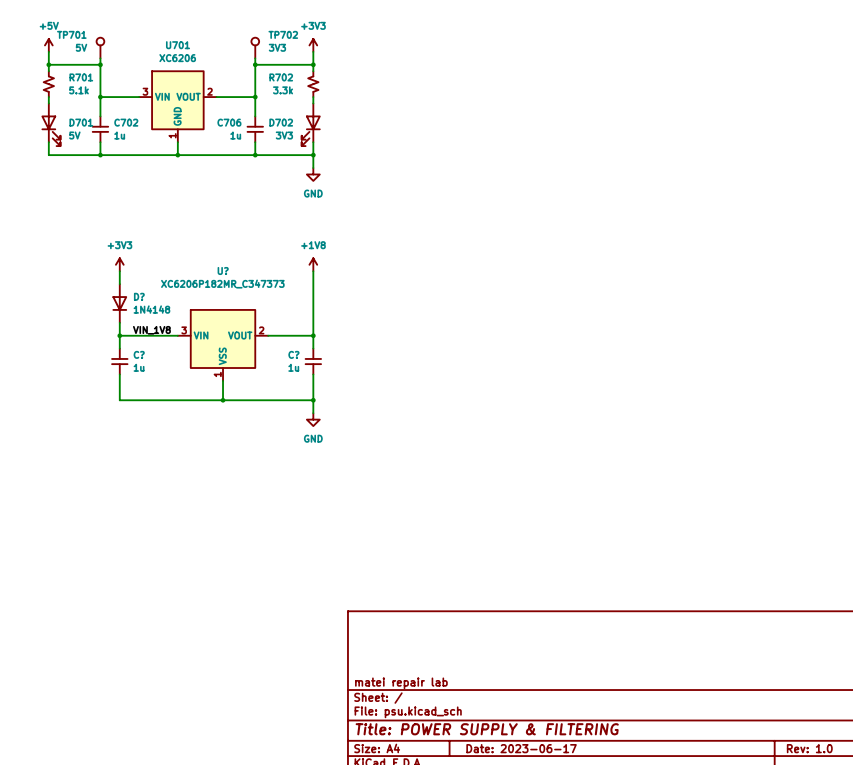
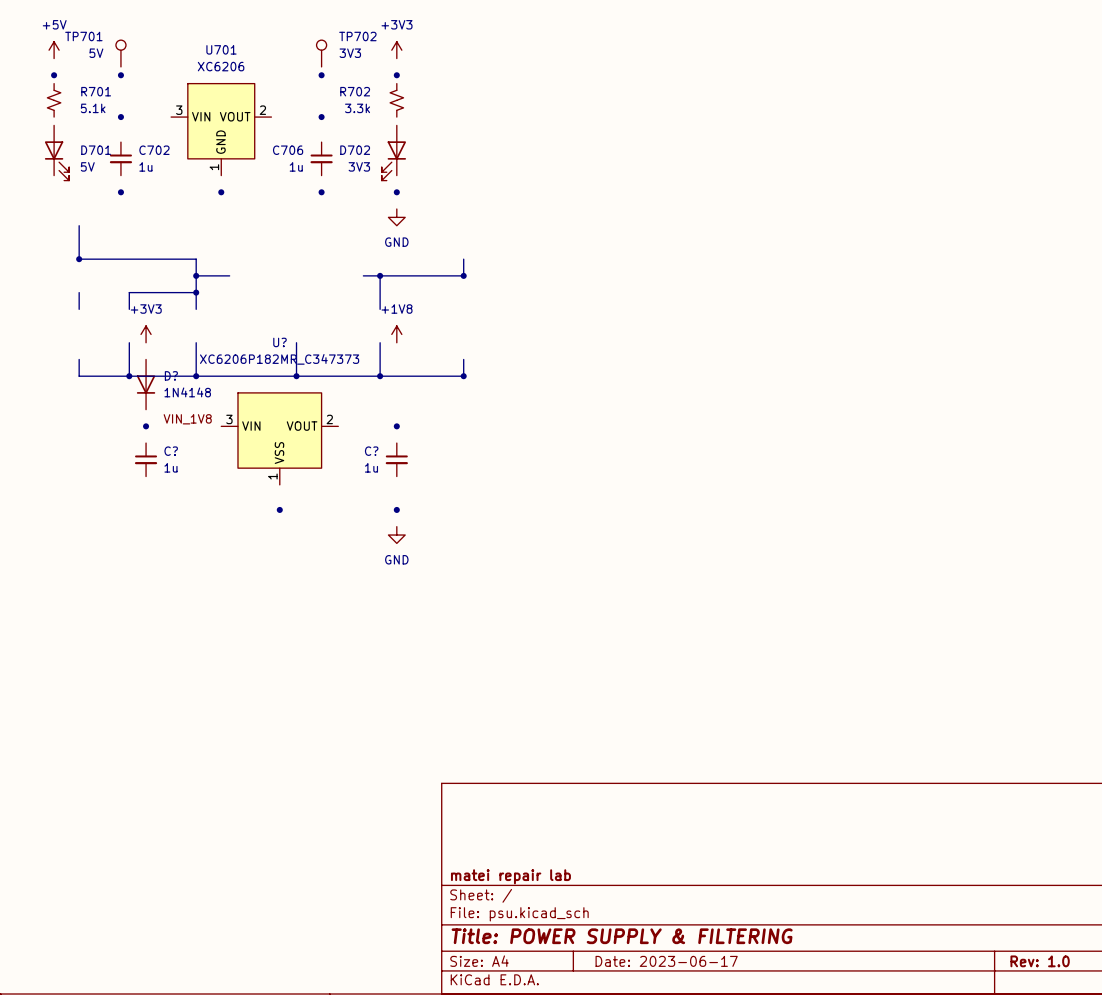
wire: (48, 51) (48, 71) -> none
wire: (313, 51) (313, 71) -> none
wire: (100, 58) (100, 116) -> none
wire: (255, 58) (255, 116) -> none
wire: (48, 64) (100, 64) -> none
wire: (255, 64) (313, 64) -> none
wire: (48, 97) (48, 103) -> none
wire: (100, 97) (139, 97) -> none
wire: (216, 97) (255, 97) -> none
wire: (313, 97) (313, 103) -> none
wire: (48, 142) (48, 155) (313, 155) -> none
wire: (100, 142) (100, 155) -> none
wire: (177, 142) (177, 155) -> none
wire: (255, 142) (255, 155) -> none
wire: (313, 142) (313, 168) -> (380, 275) (380, 309)
wire: none -> (79, 225) (79, 259) (196, 259) (196, 309)
junction: none -> (79, 259)
wire: none -> (463, 259) (463, 275) (363, 275)
wire: none -> (196, 275) (229, 275)
junction: none -> (196, 275)
junction: none -> (380, 275)
junction: none -> (463, 275)
wire: none -> (196, 292) (129, 292) (129, 309)
junction: none -> (196, 292)
wire: (119, 271) (119, 284) -> (79, 292) (79, 309)
wire: none -> (196, 342) (196, 376)
wire: none -> (296, 342) (296, 376)
wire: none -> (380, 342) (380, 376)
wire: (313, 271) (313, 348) -> none
wire: none -> (79, 359) (79, 376) (463, 376) (463, 359)
junction: none -> (129, 376)
junction: none -> (196, 376)
junction: none -> (296, 376)
junction: none -> (380, 376)
junction: none -> (463, 376)
wire: (119, 322) (119, 348) -> (129, 342) (129, 376)
wire: (119, 335) (177, 335) -> none
wire: (268, 335) (313, 335) -> none
wire: (119, 374) (119, 400) (313, 400) -> none
wire: (313, 374) (313, 413) -> none
wire: (223, 380) (223, 400) -> none

